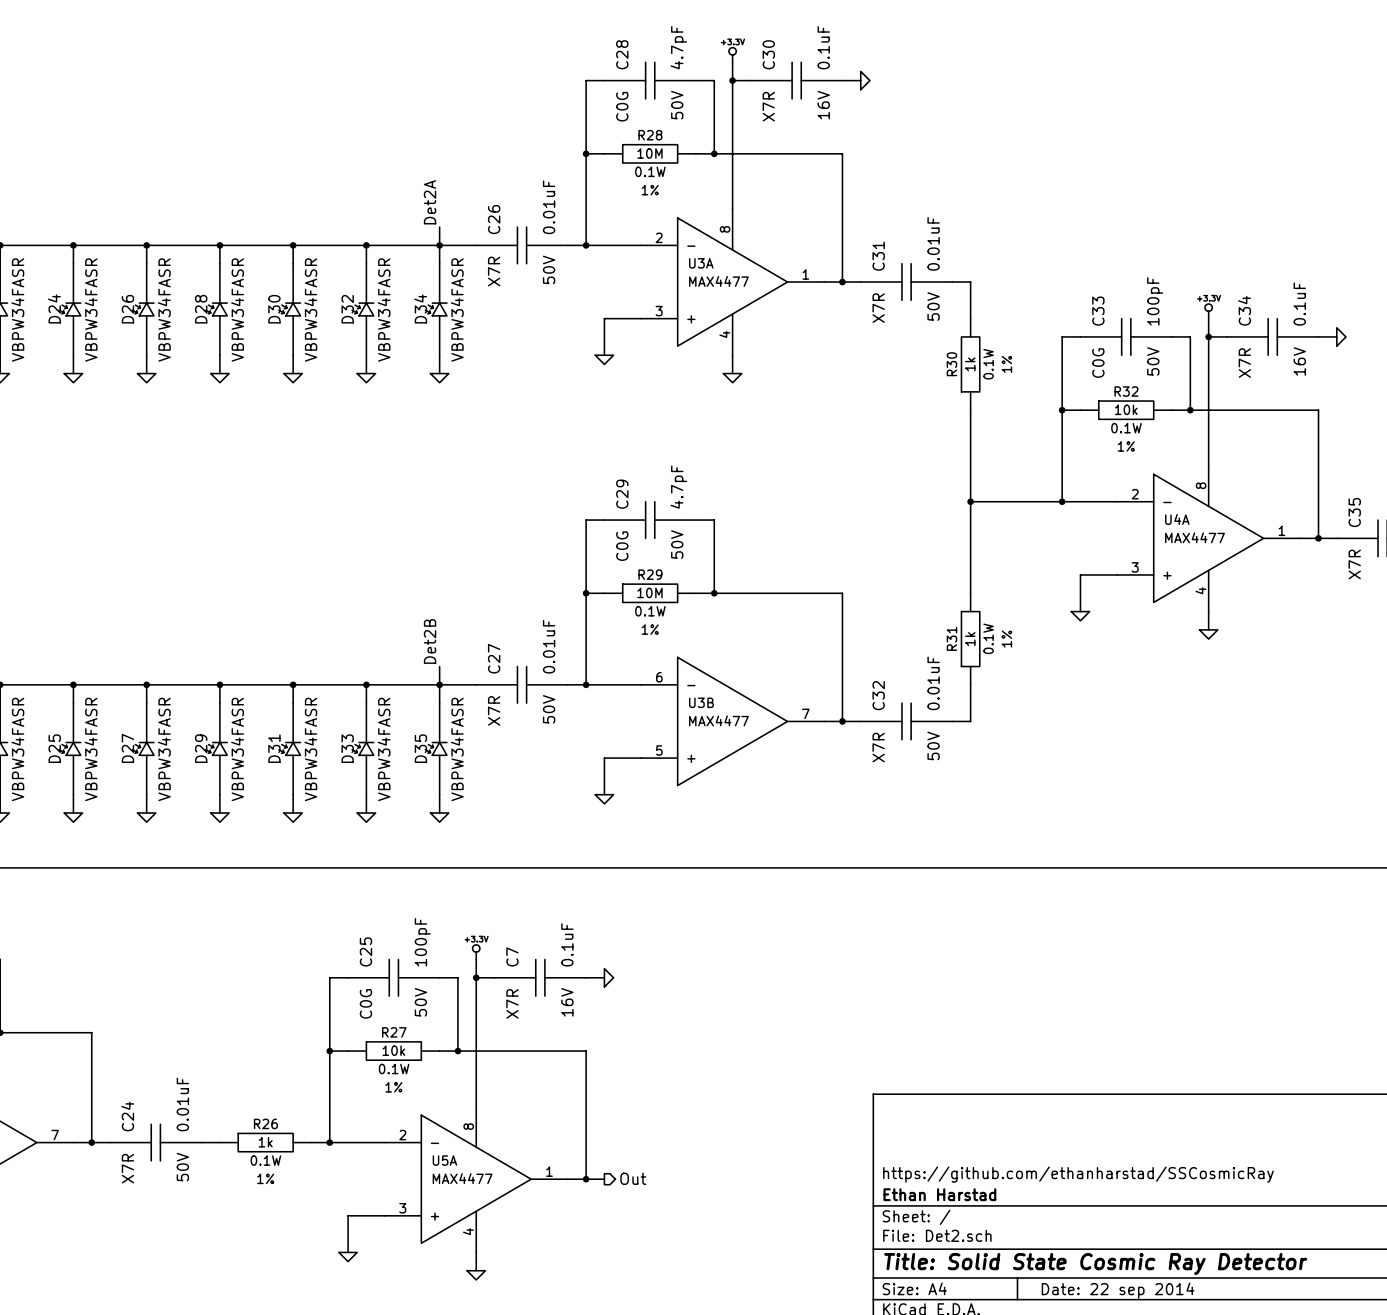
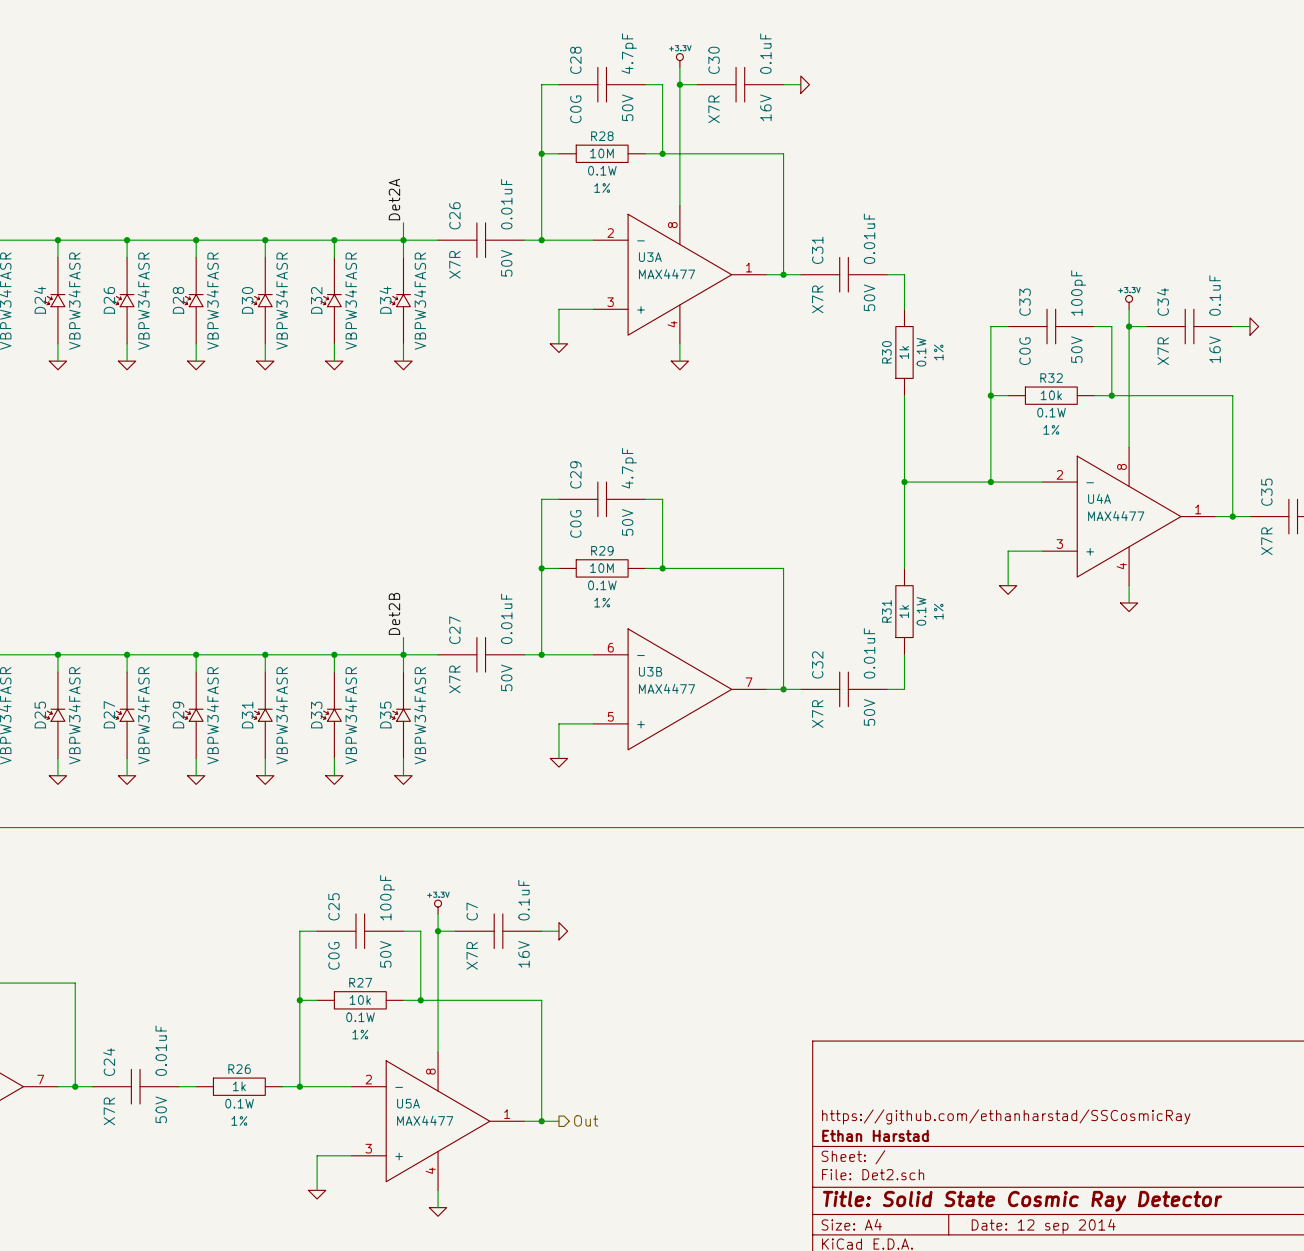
title block: Date: 22 sep 2014 (1118, 1290) -> Date: 12 sep 2014 (1043, 1226)

